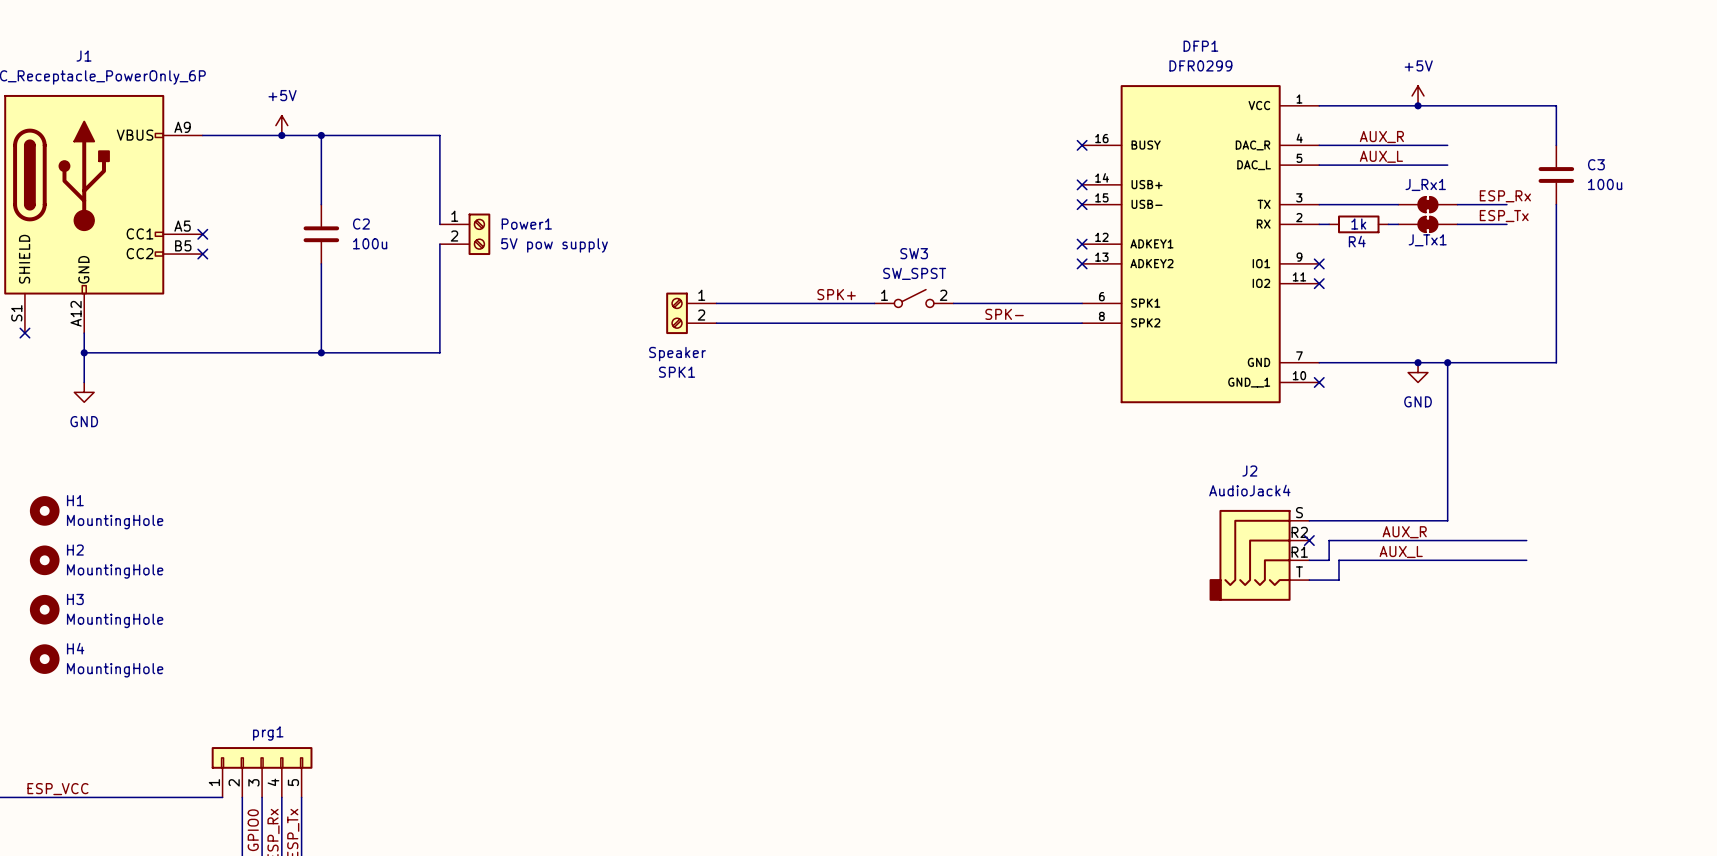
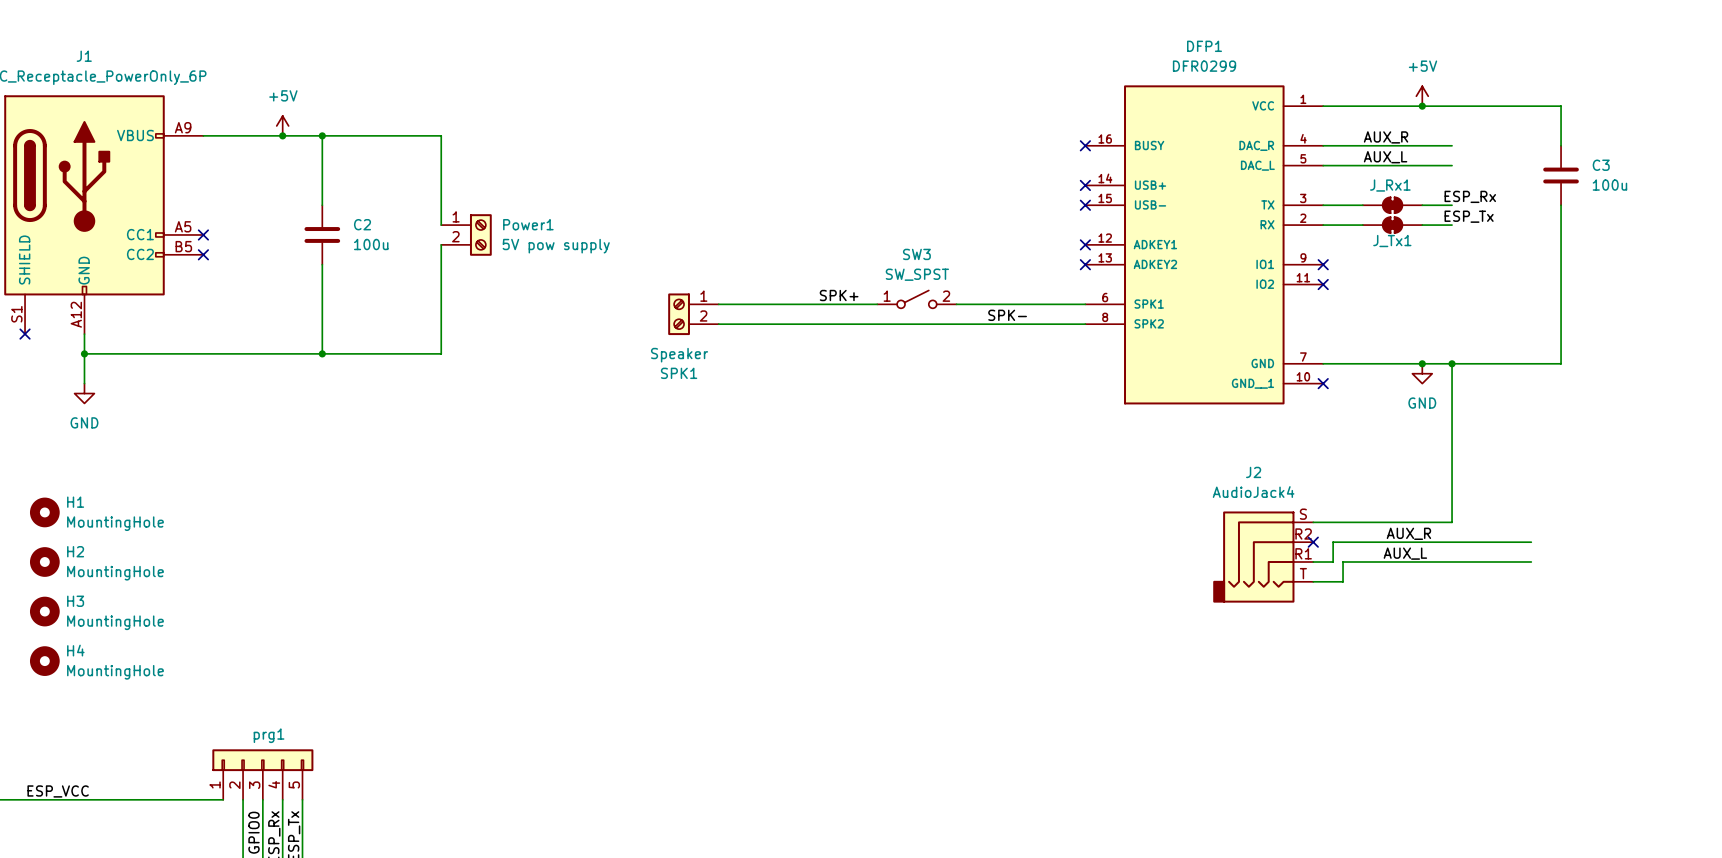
label position: ESP_Rx (1505, 196) -> ESP_Rx (1470, 196)
J_Rx1 position: (1427, 204) -> (1392, 205)
wire: (1457, 204) (1506, 204) -> none
label position: ESP_Tx (1504, 216) -> ESP_Tx (1469, 216)
wire: none -> (1333, 225) (1362, 225)
R4: 1k (1358, 224) -> none
J_Tx1 position: (1427, 224) -> (1392, 225)
wire: (1457, 224) (1506, 224) -> none

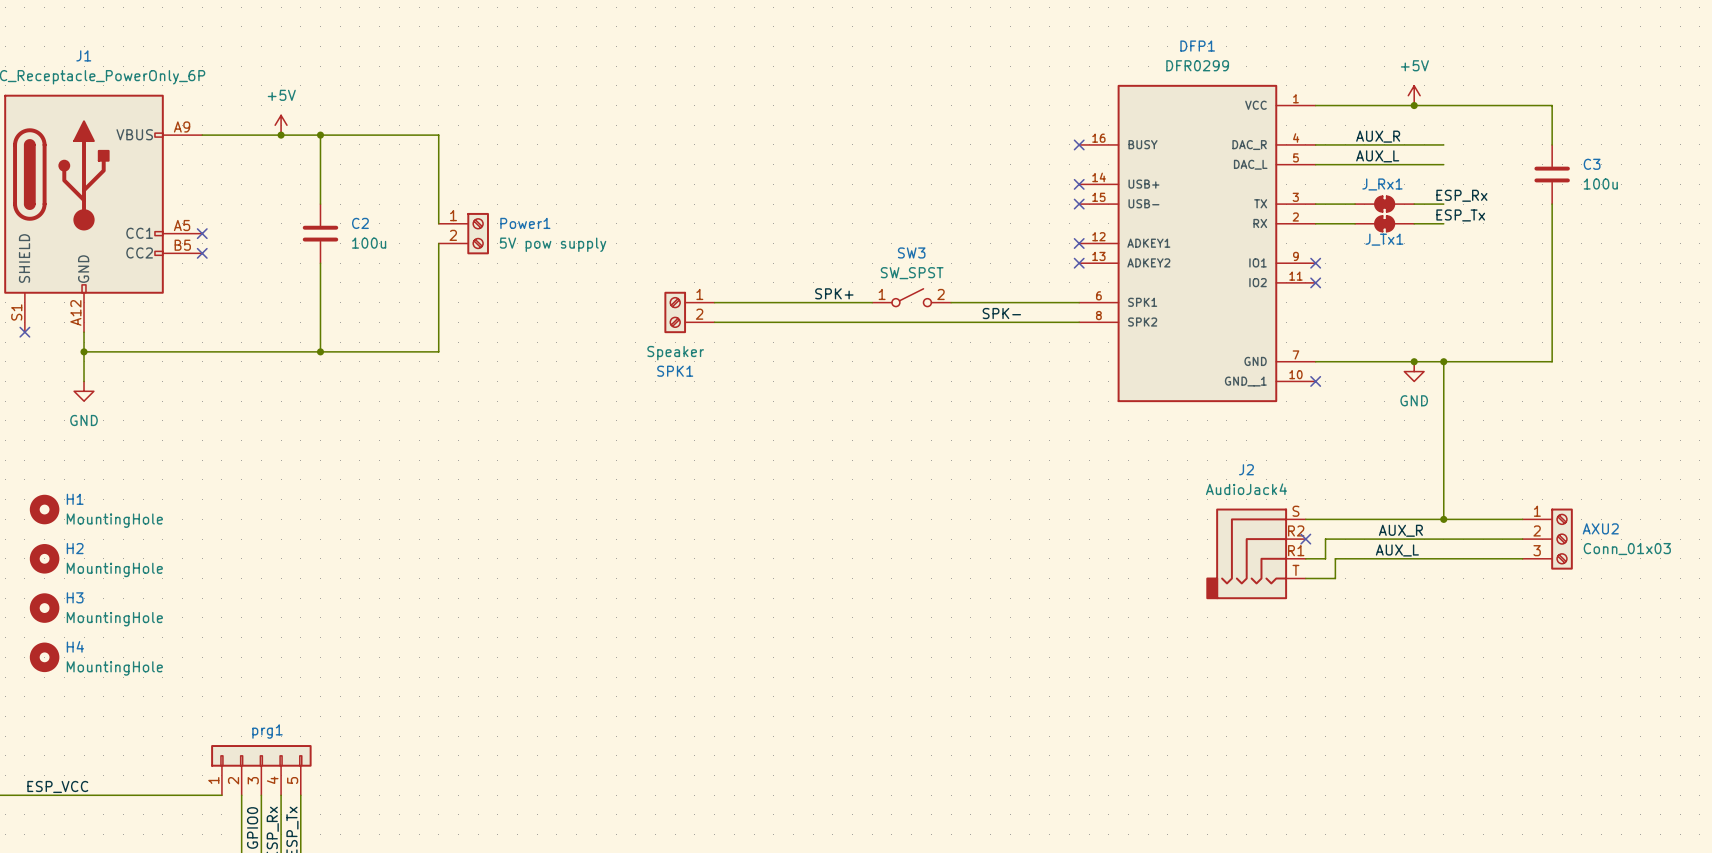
wire: none -> (1443, 519) (1522, 519)
junction: none -> (1443, 519)
AXU2: none -> Conn_01x03 (1547, 539)

